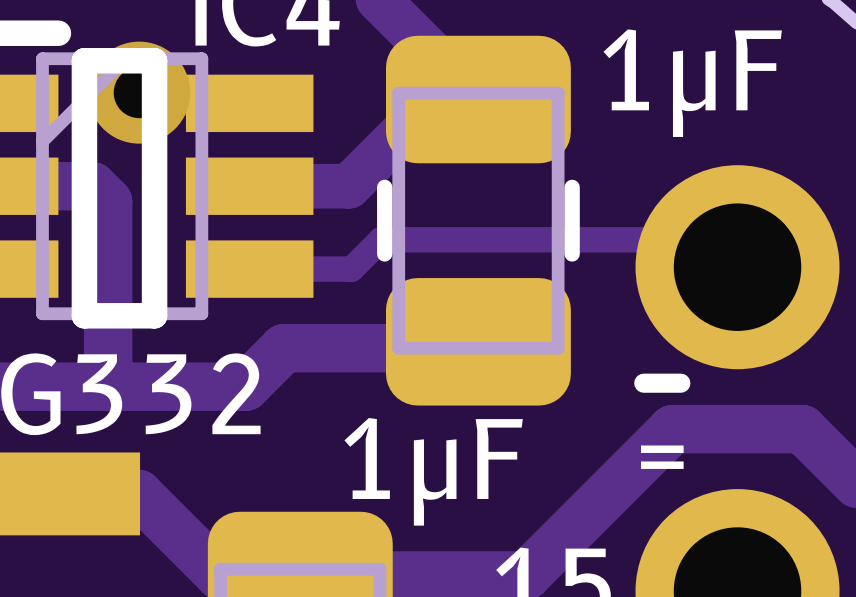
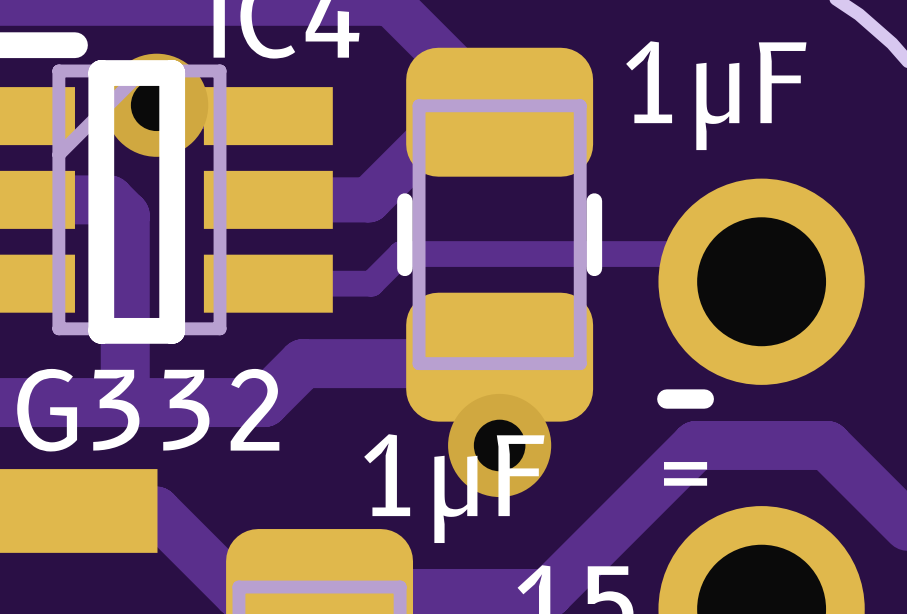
via: none -> (499, 445)

